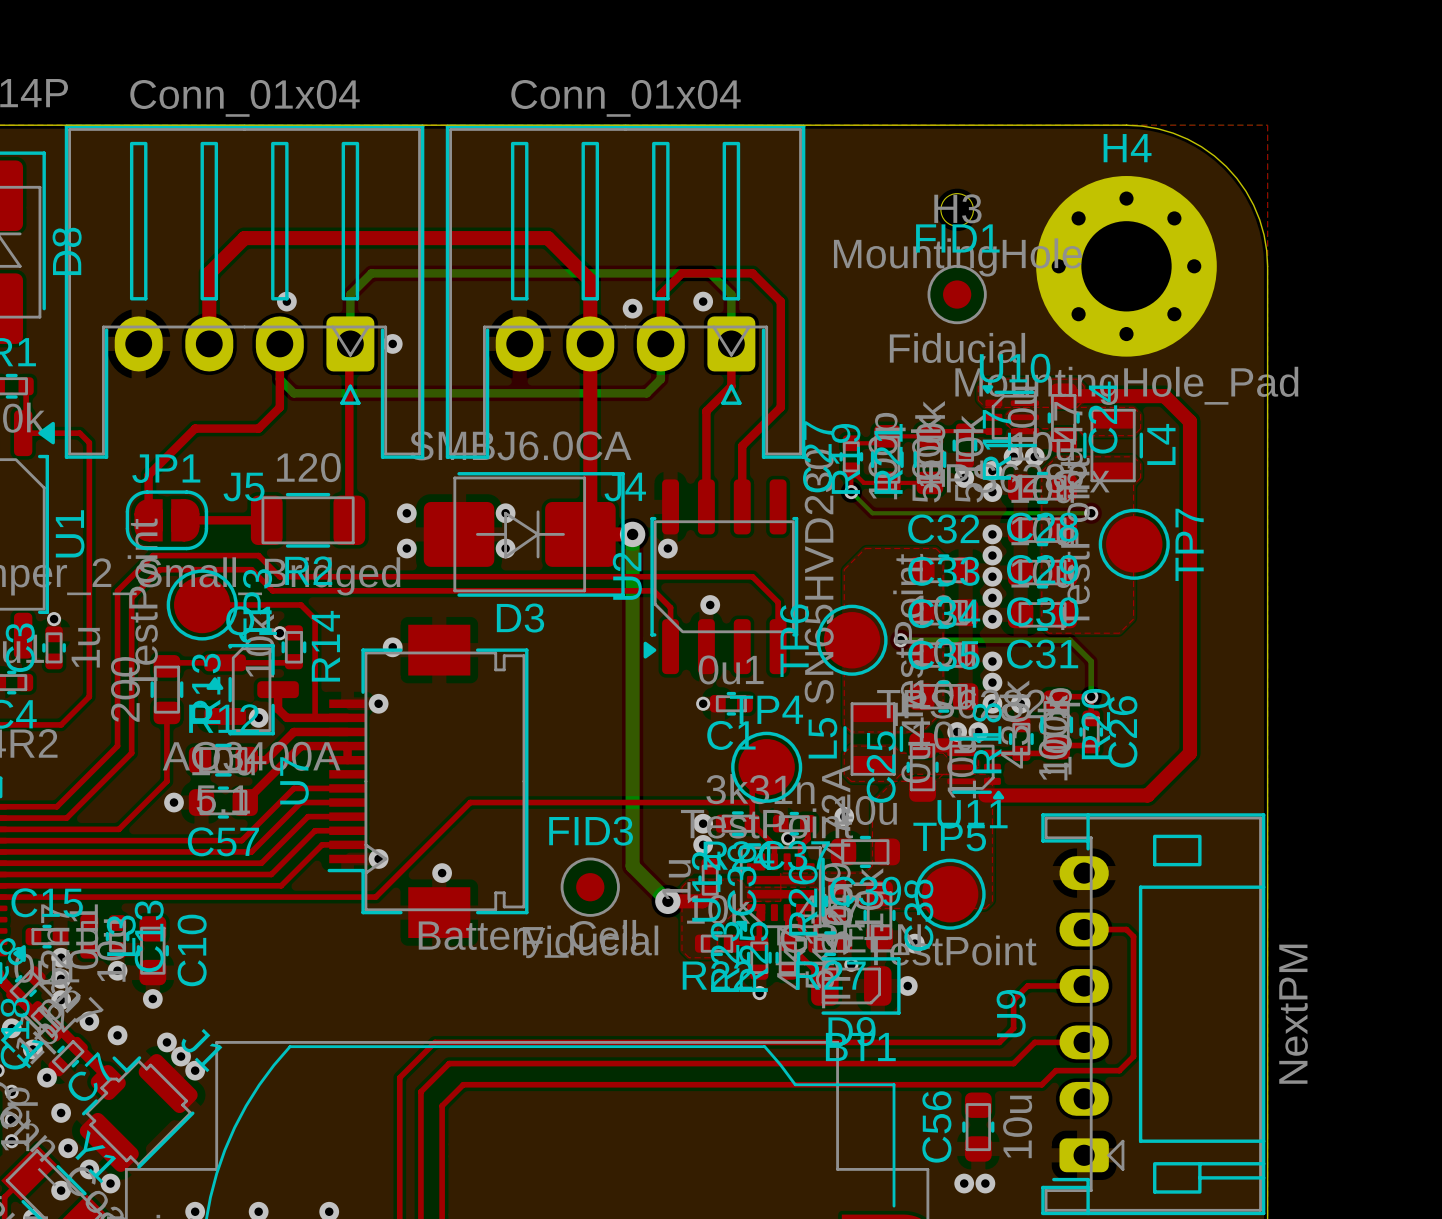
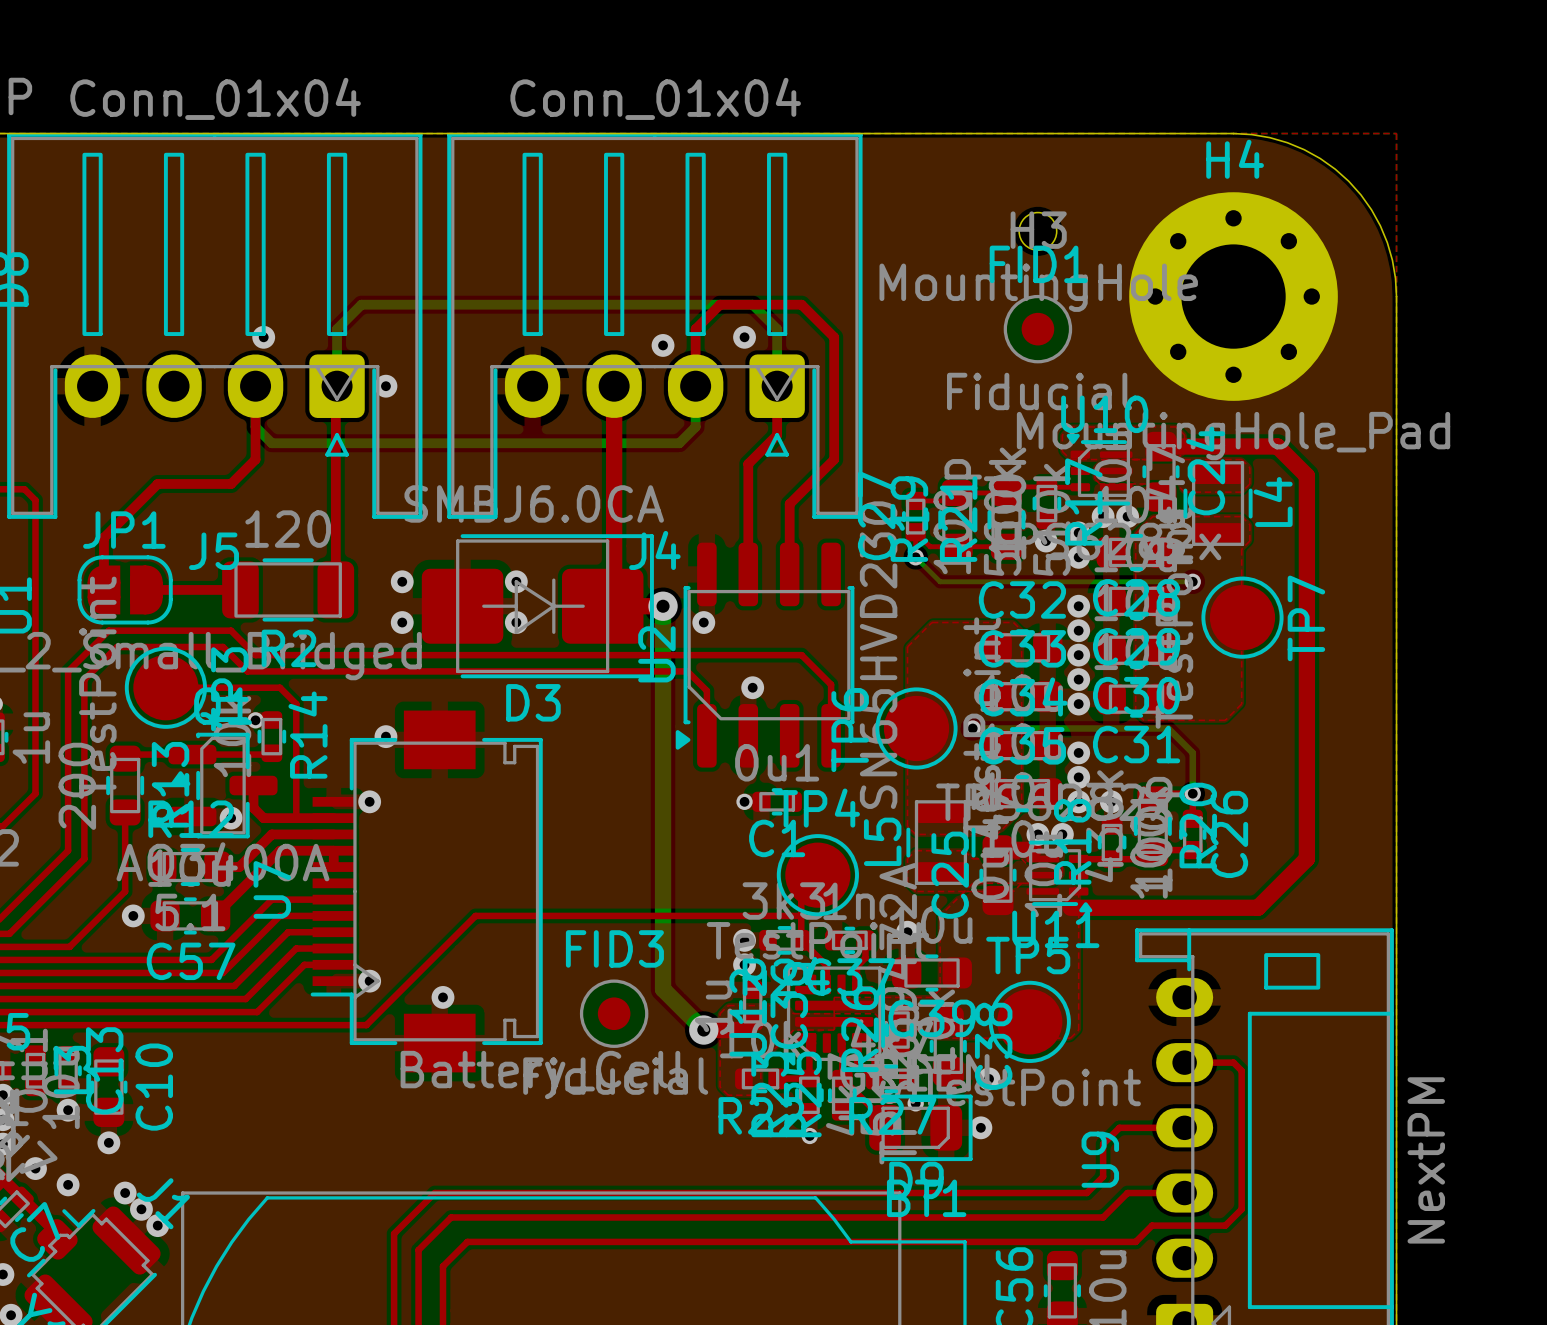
top track: (209, 343) (209, 273) (244, 238) (547, 238) (590, 280) (590, 343) -> none
via: (788, 838) -> none

